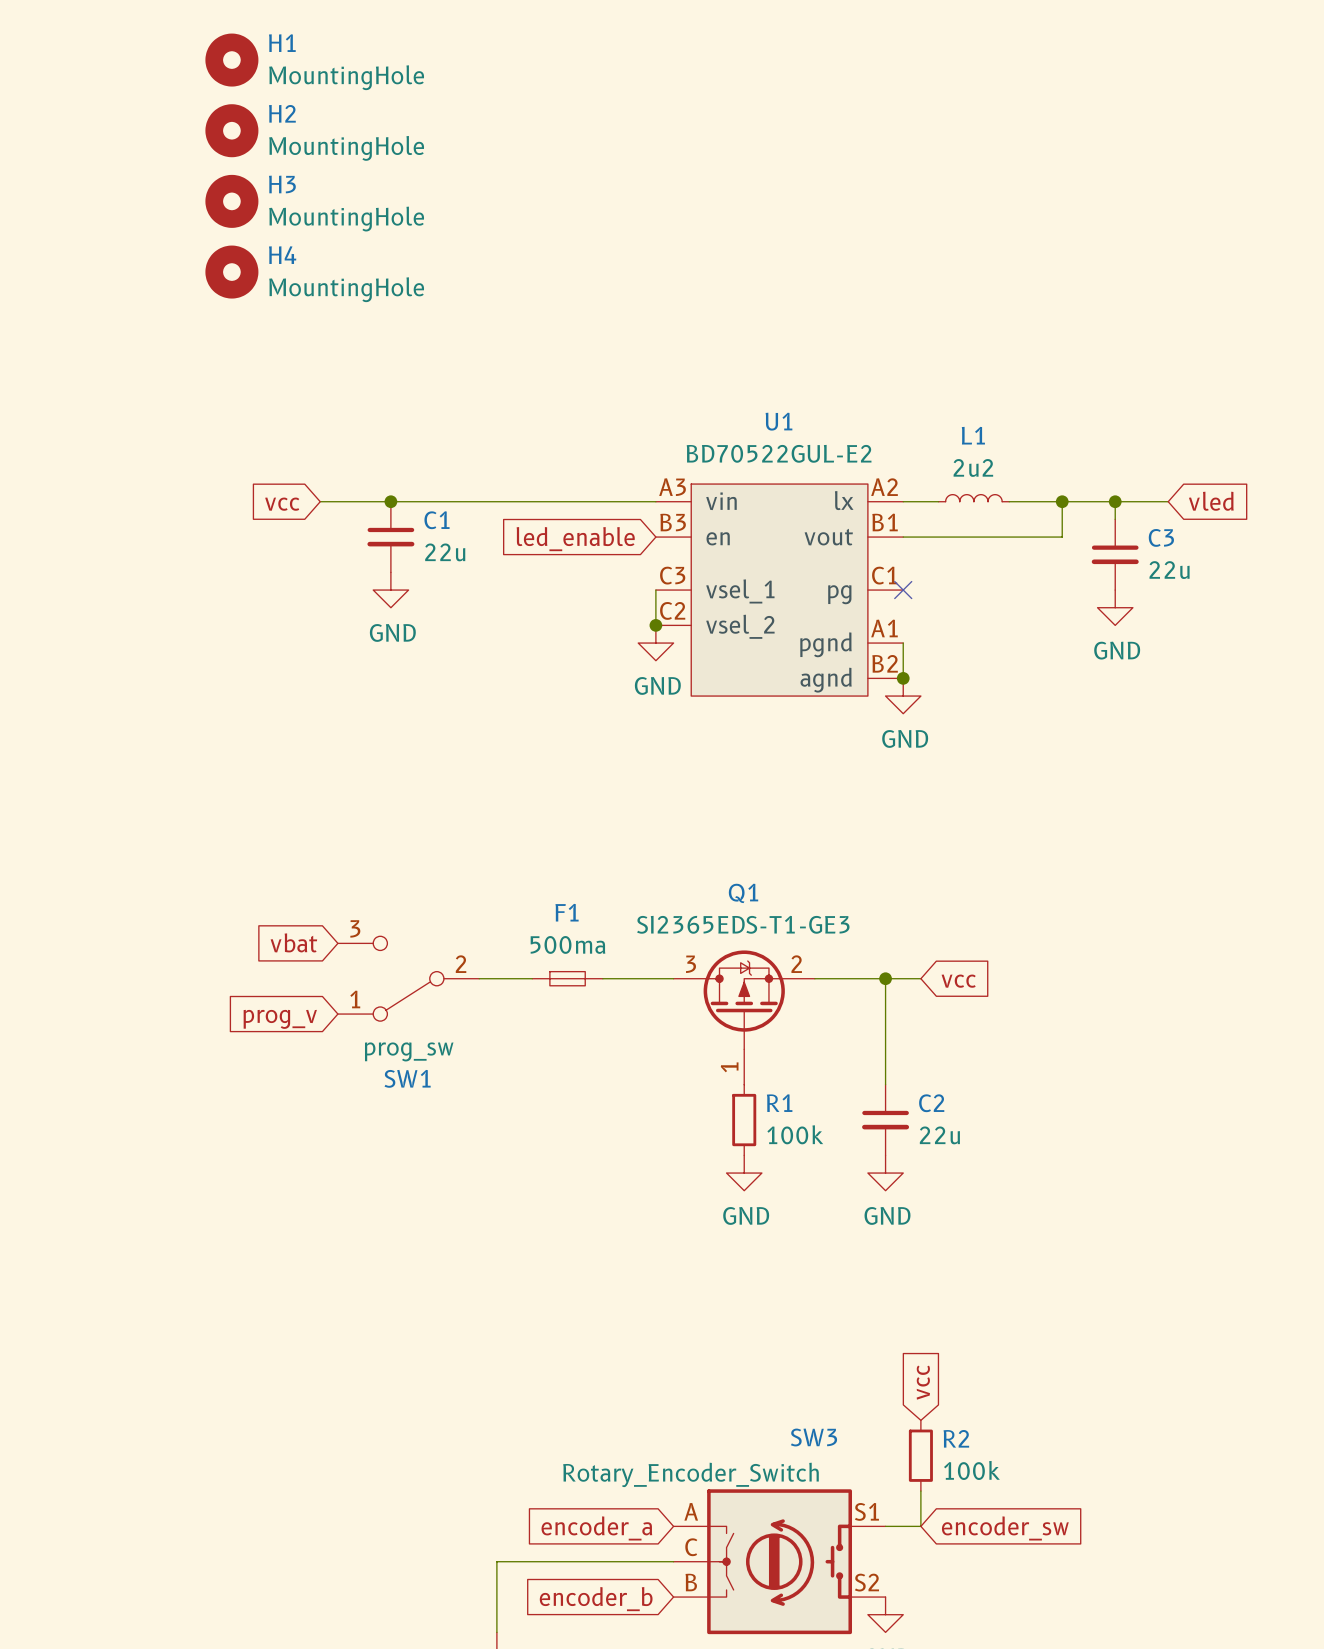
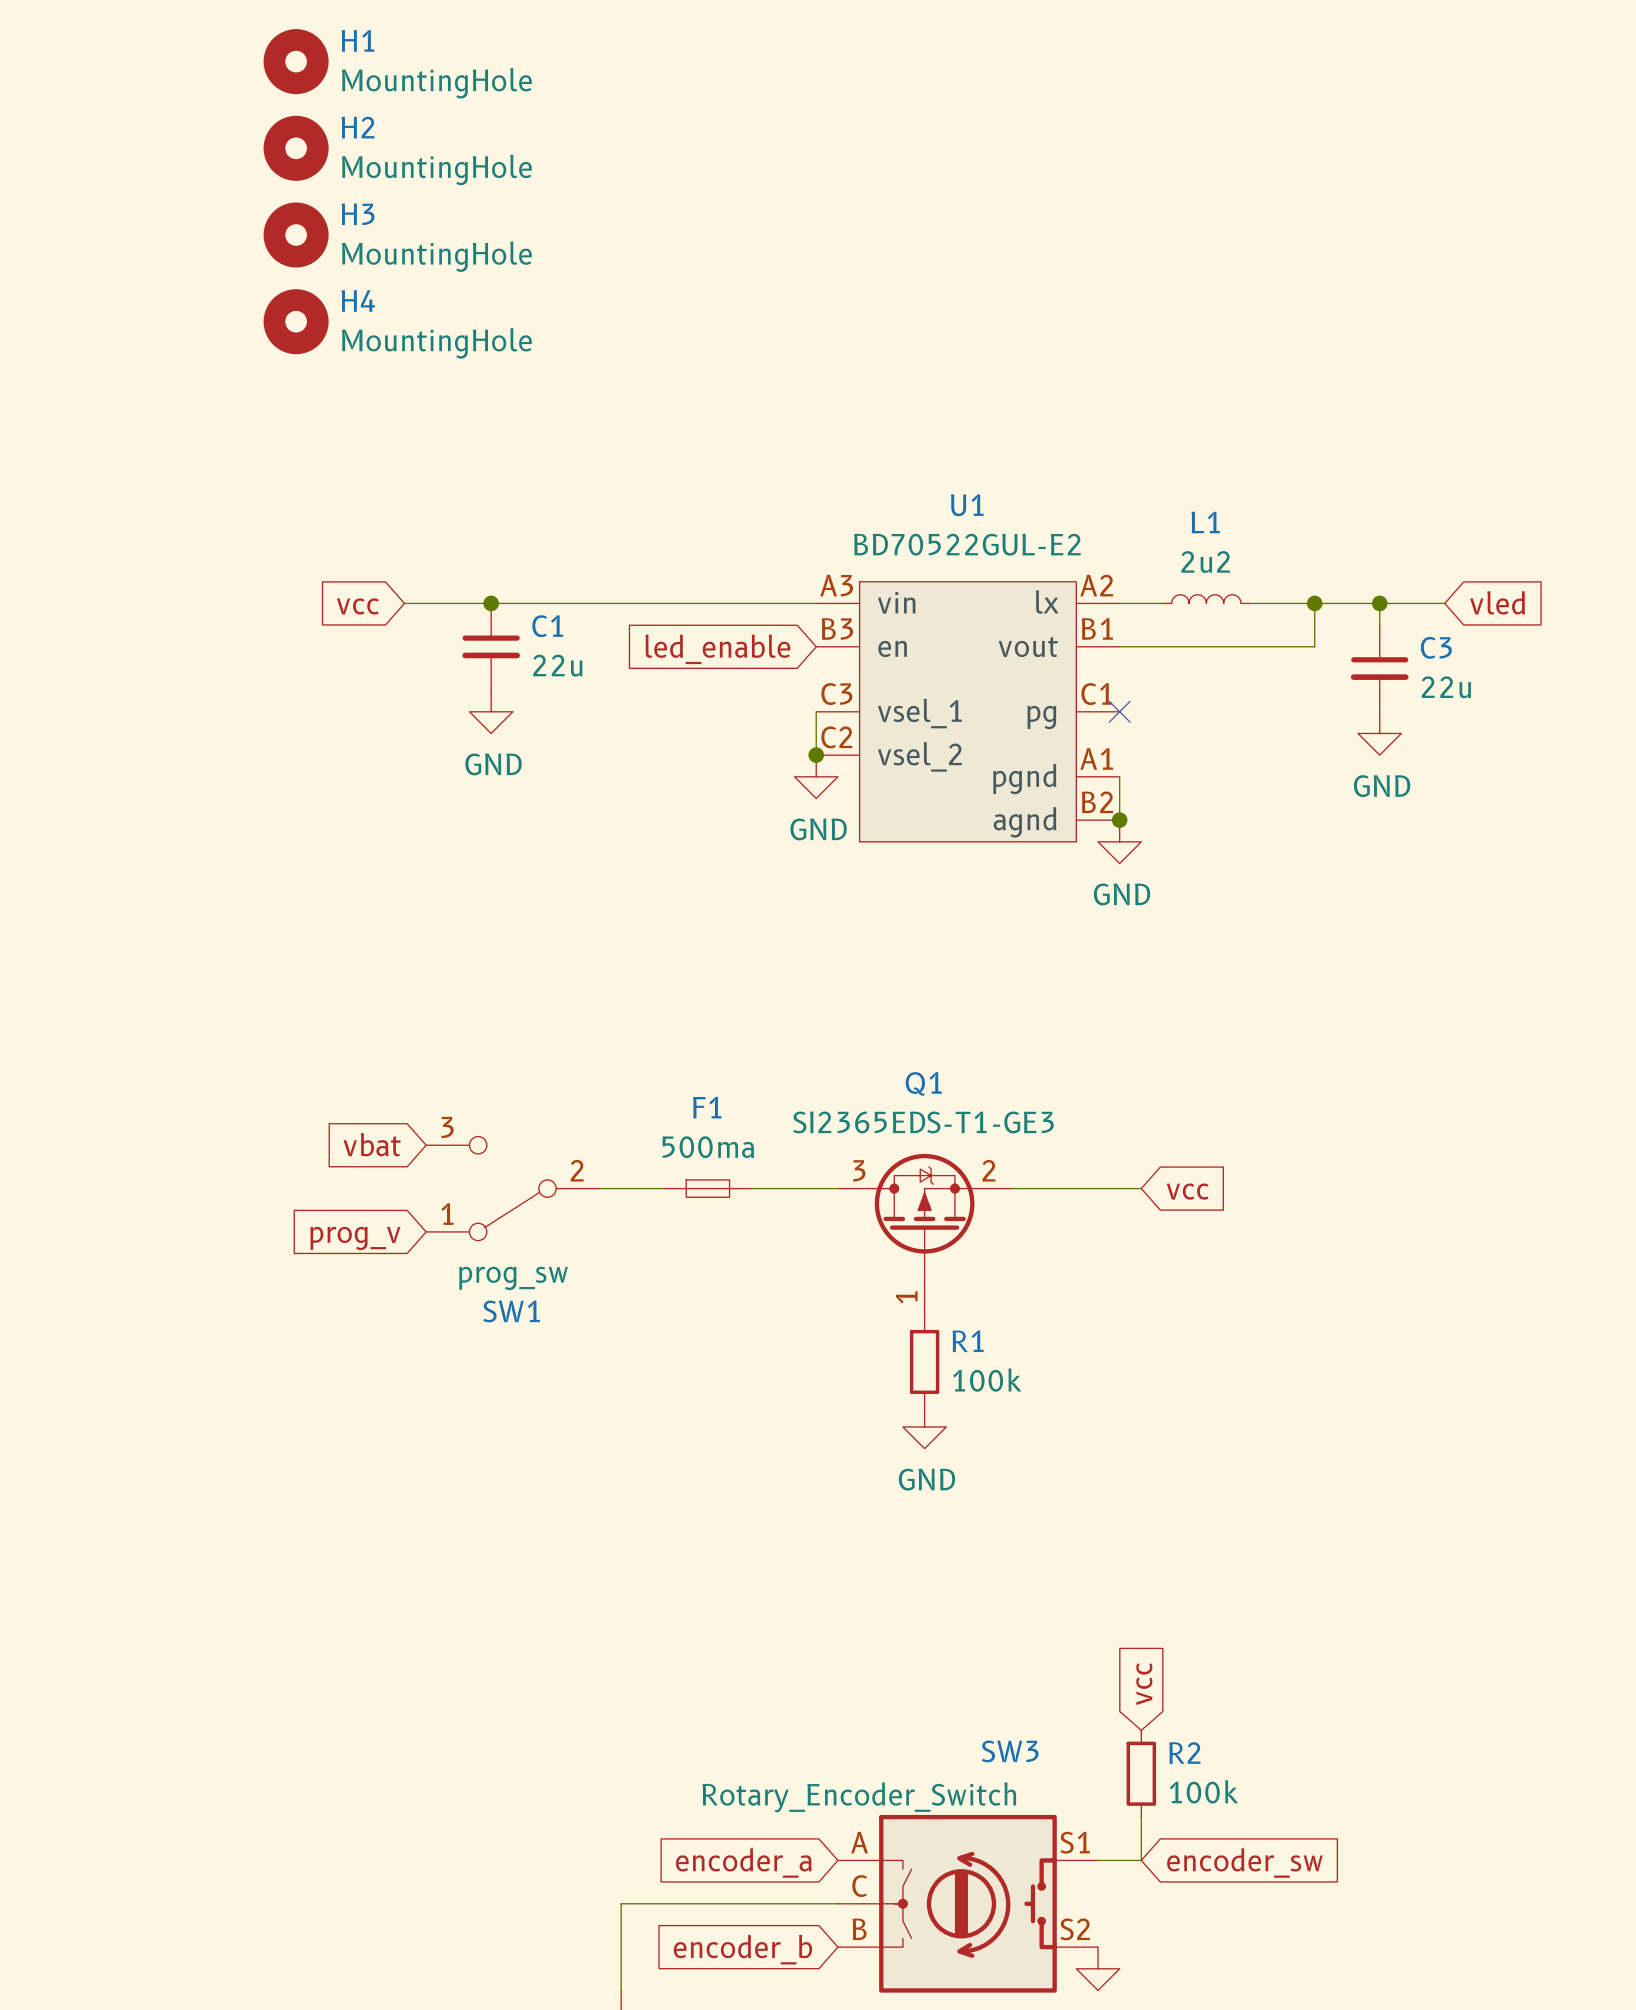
wire: (885, 978) (885, 1084) -> none
junction: (885, 978) -> none
C2: 22u (885, 1120) -> none
power symbol: GND (885, 1173) -> none

